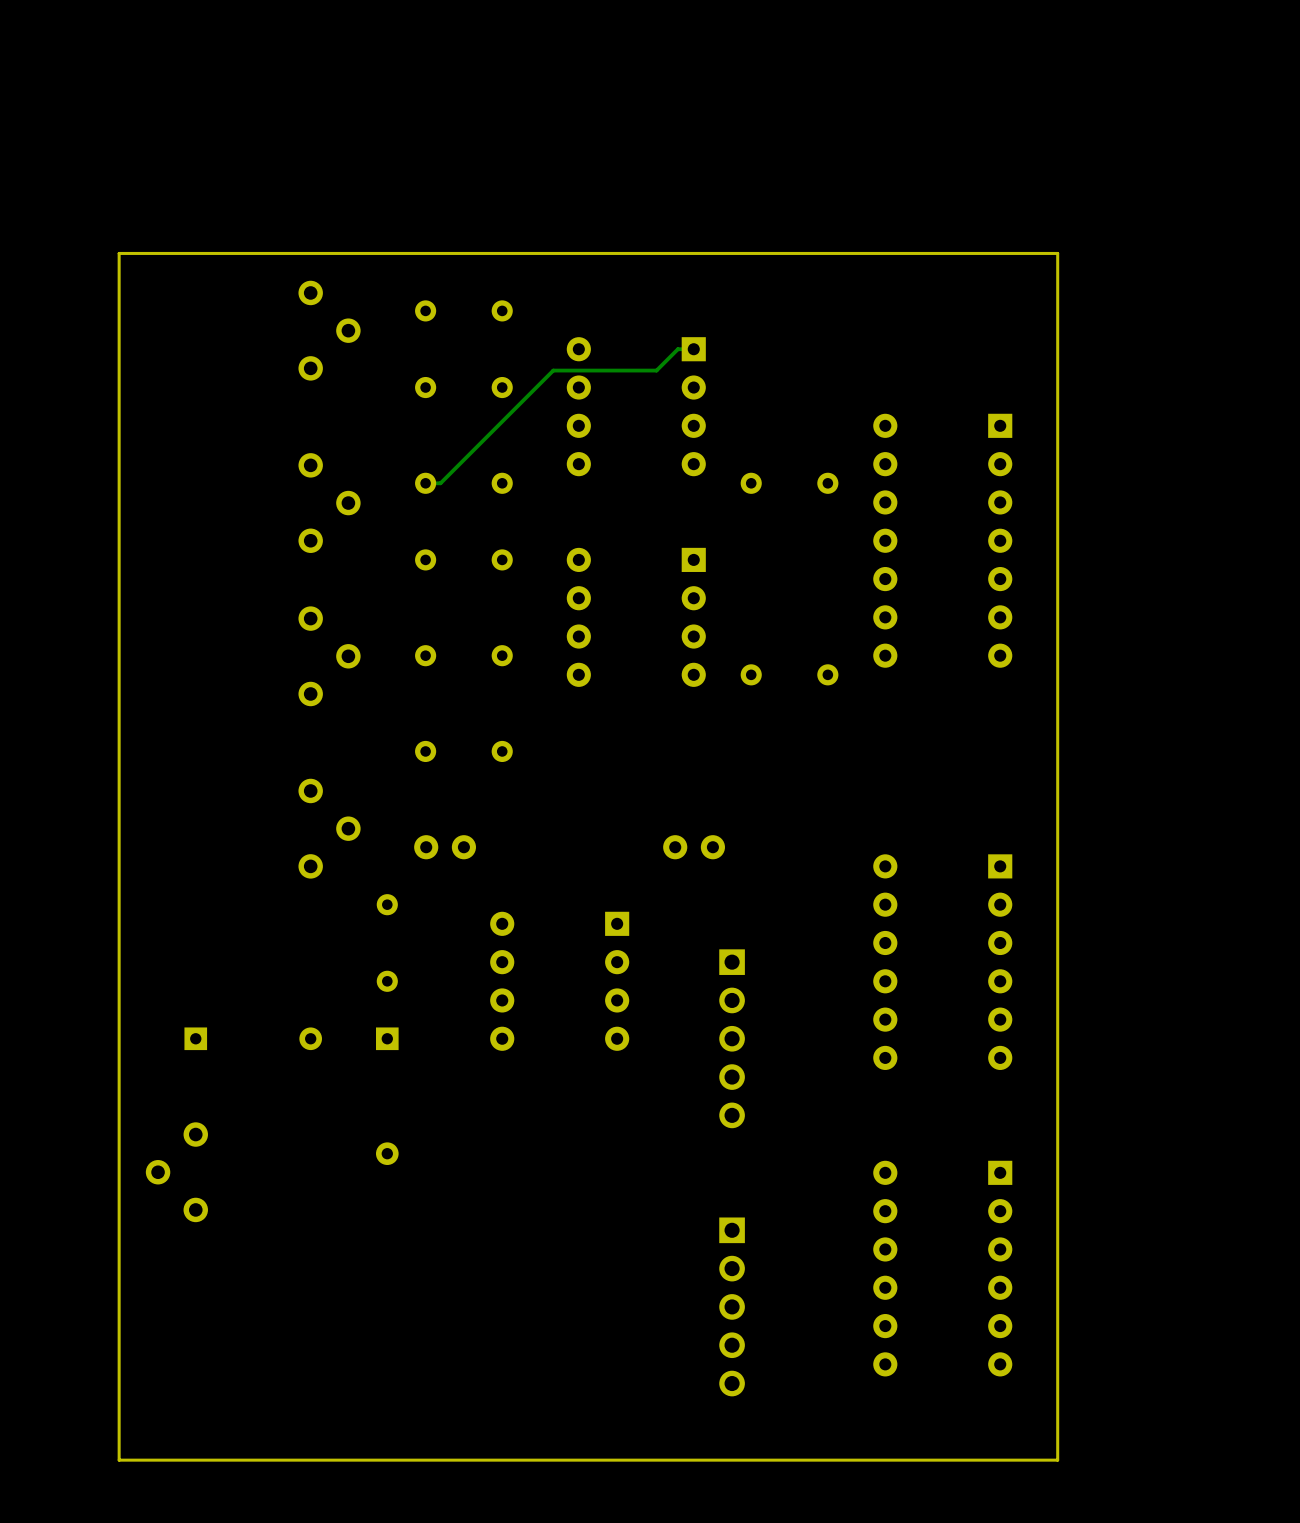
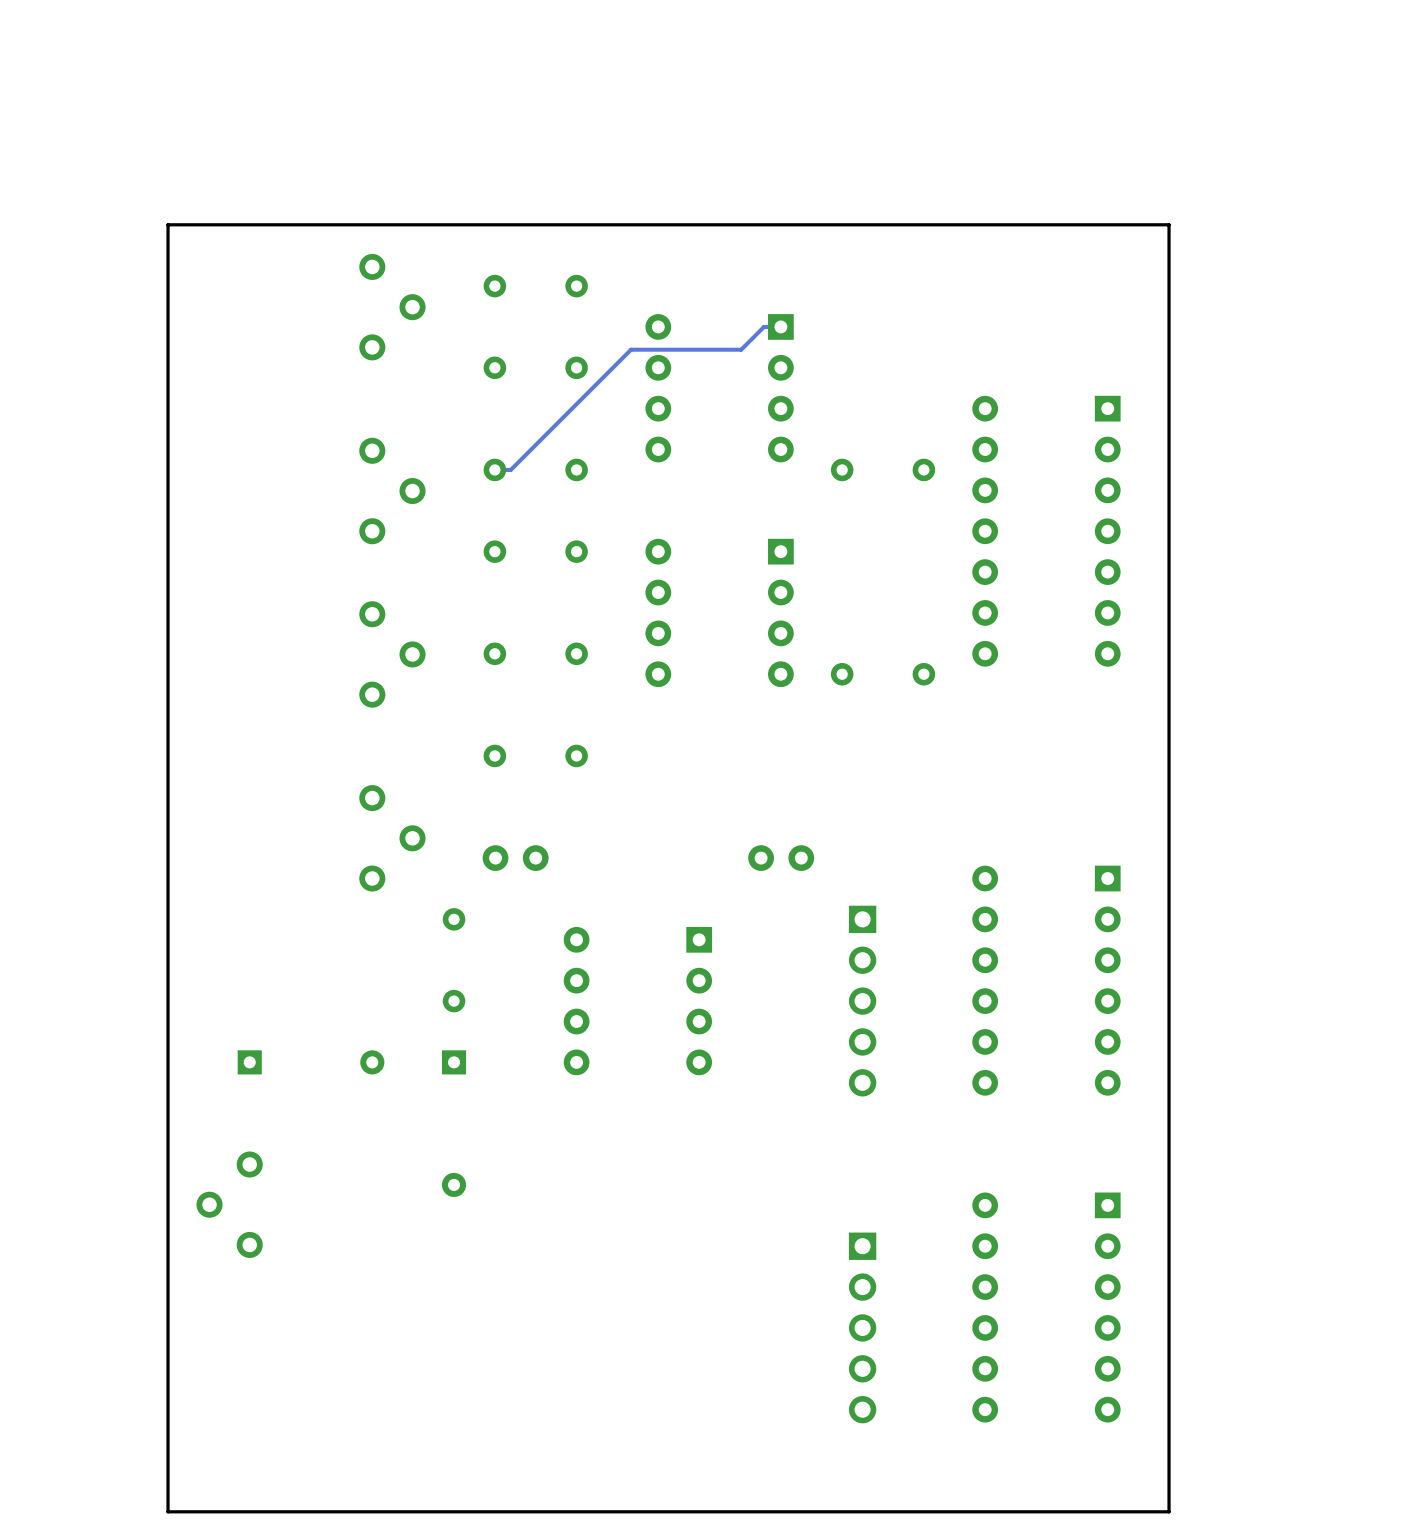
part position: (732, 1038) -> (862, 1001)
part position: (732, 1306) -> (862, 1327)

